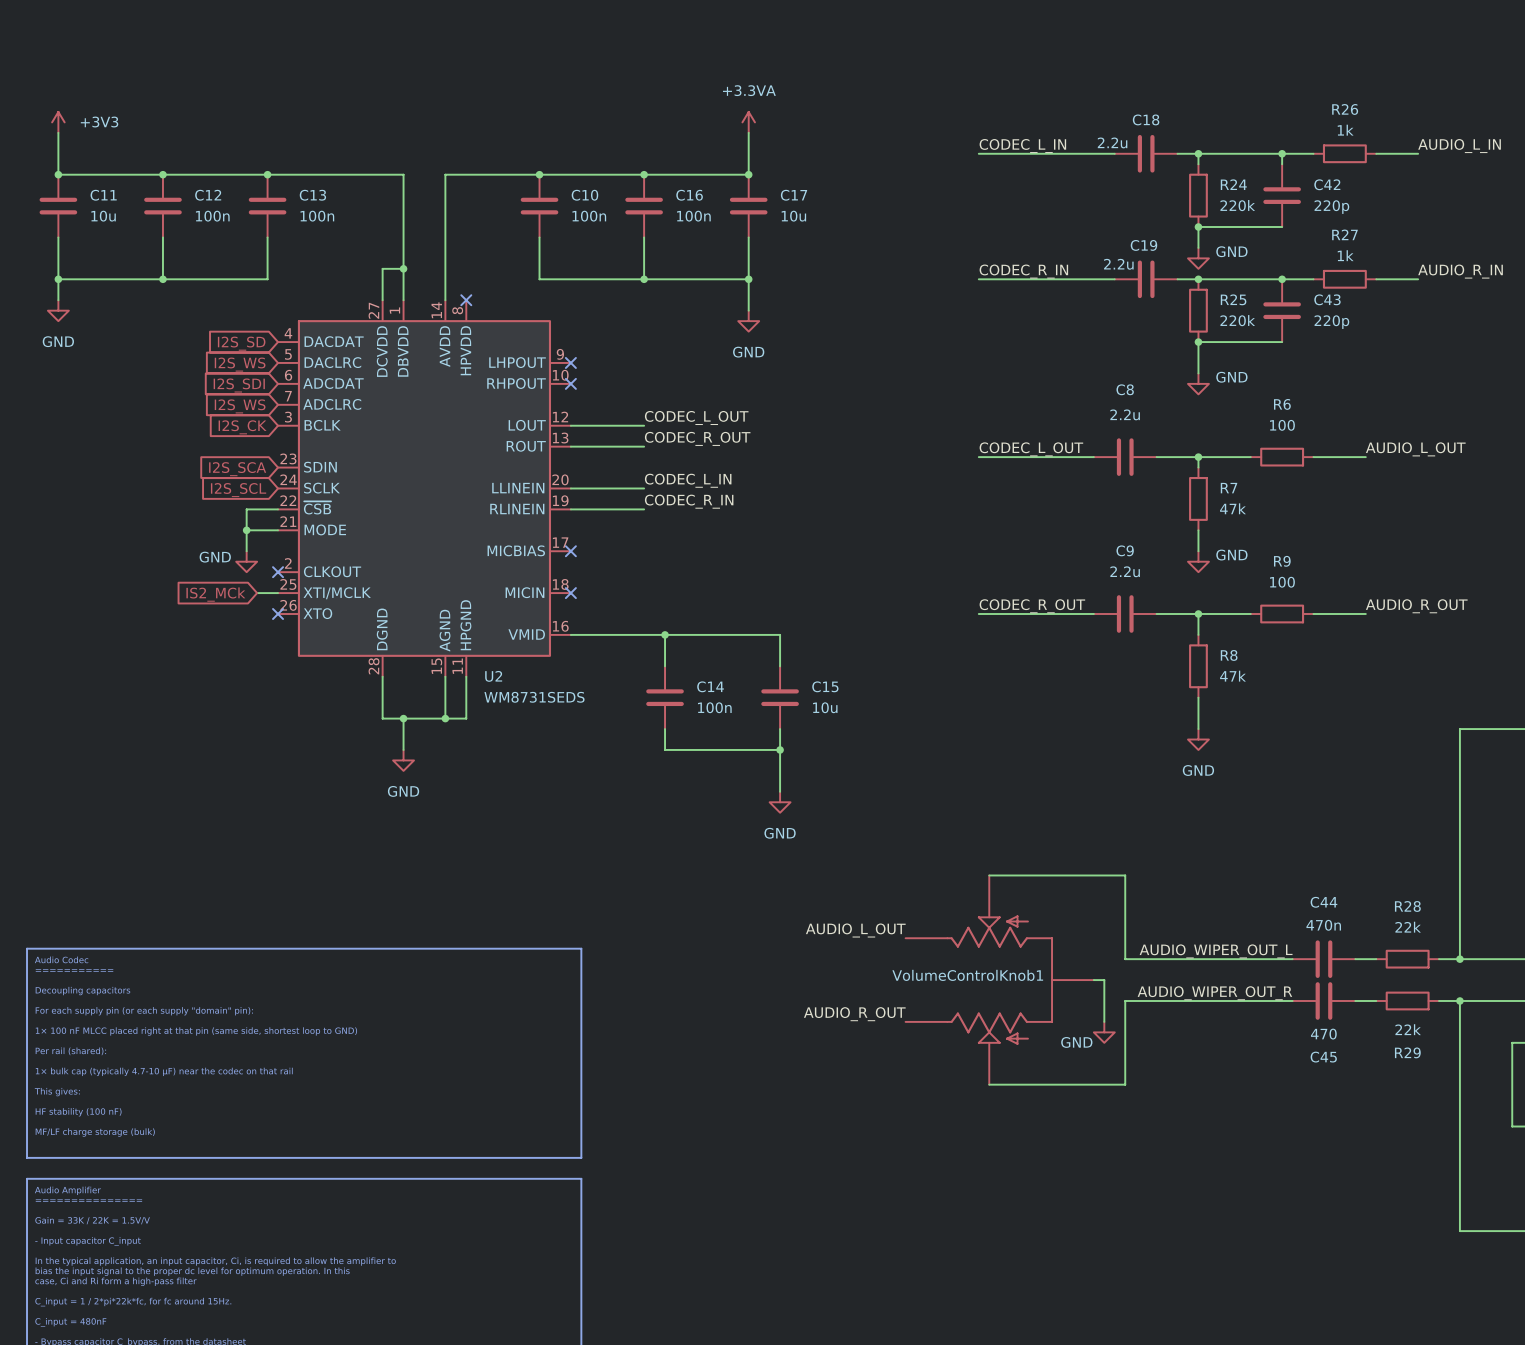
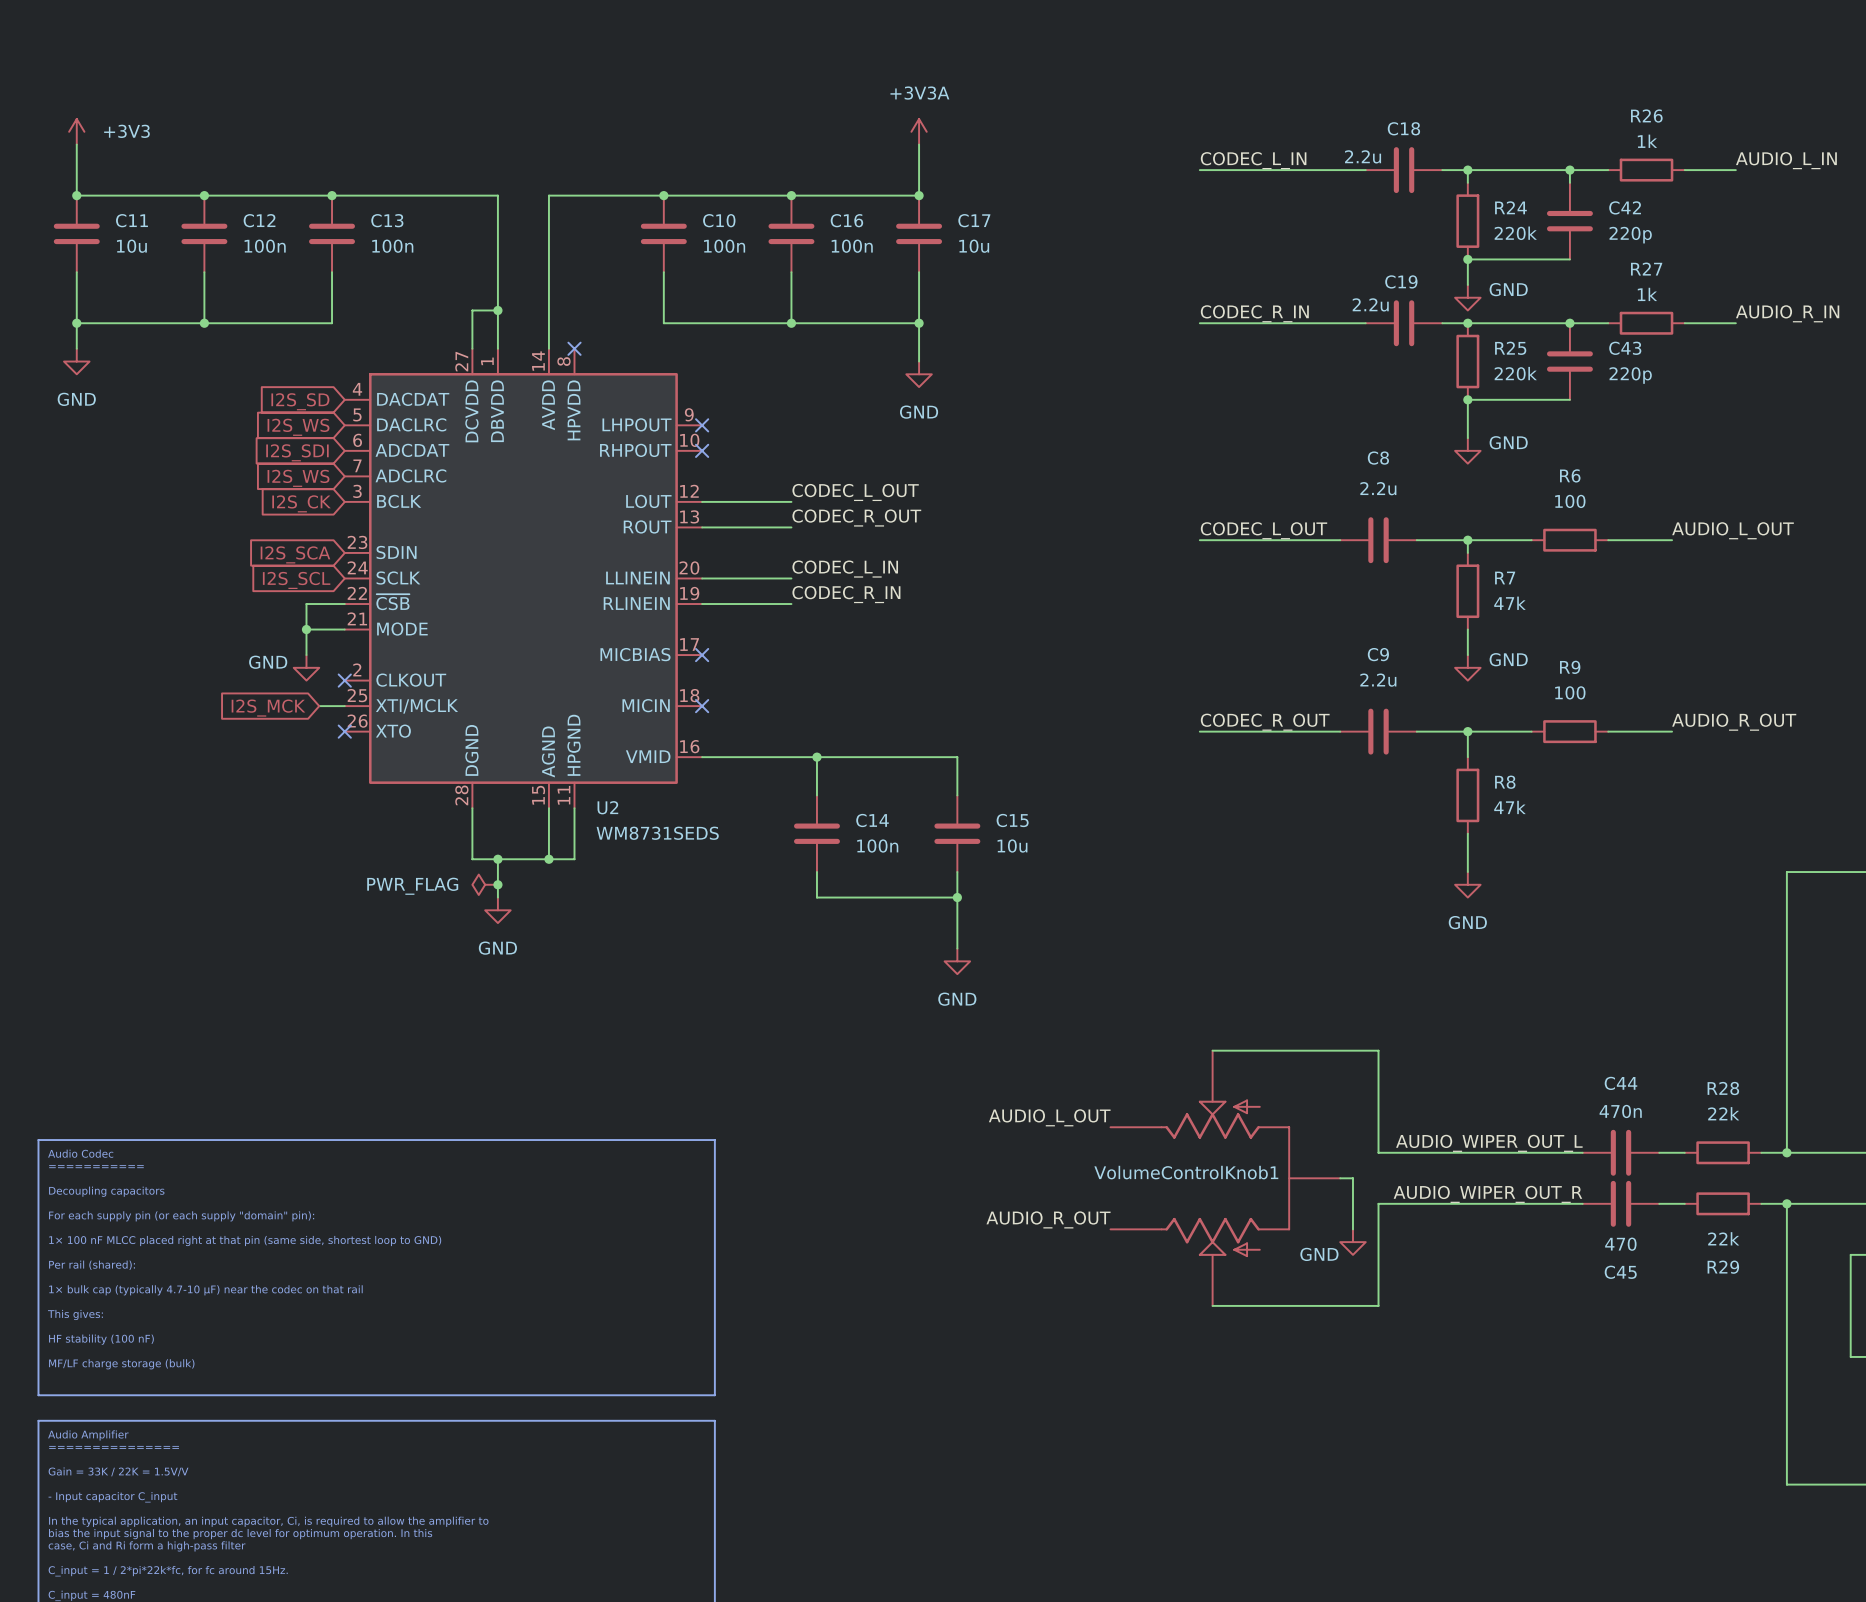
power symbol: +3.3VA (748, 122) -> +3V3A (919, 131)
global label: IS2_MCk (215, 594) -> I2S_MCK (268, 708)
power symbol: none -> PWR_FLAG (485, 884)
junction: none -> (497, 884)

